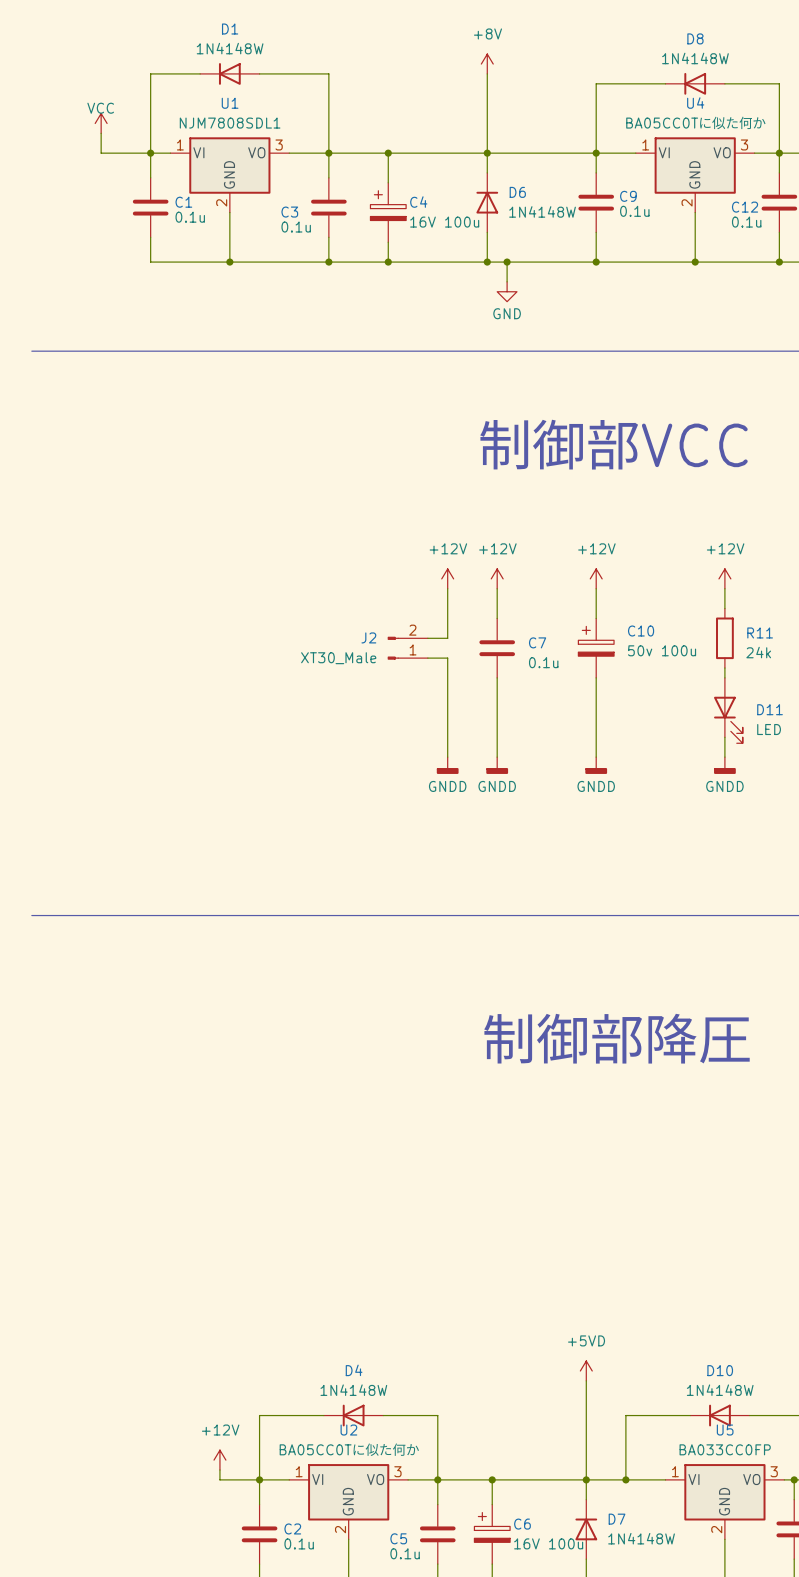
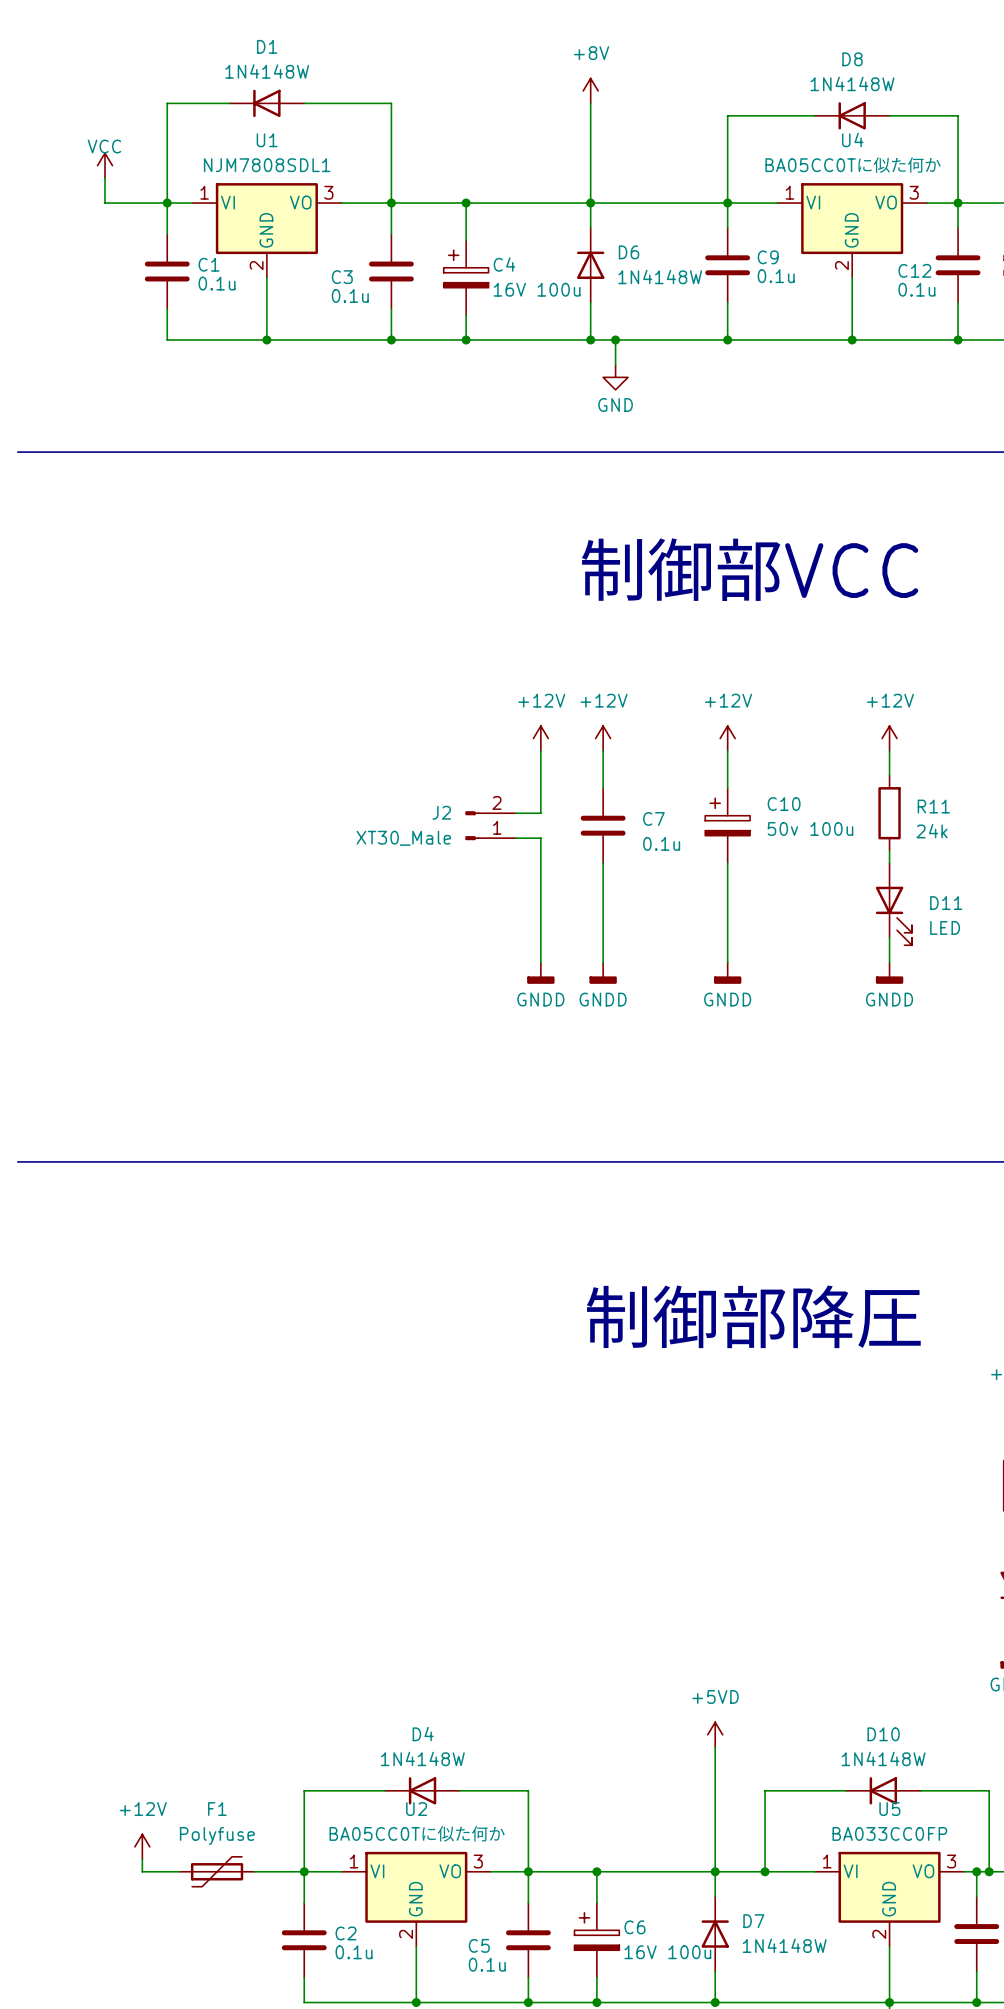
power symbol position: +12V (219, 1460) -> +12V (142, 1846)
wire: none -> (142, 1859) (142, 1871) (179, 1871)
wire: (219, 1470) (219, 1479) -> none
F1: none -> Polyfuse (217, 1871)

